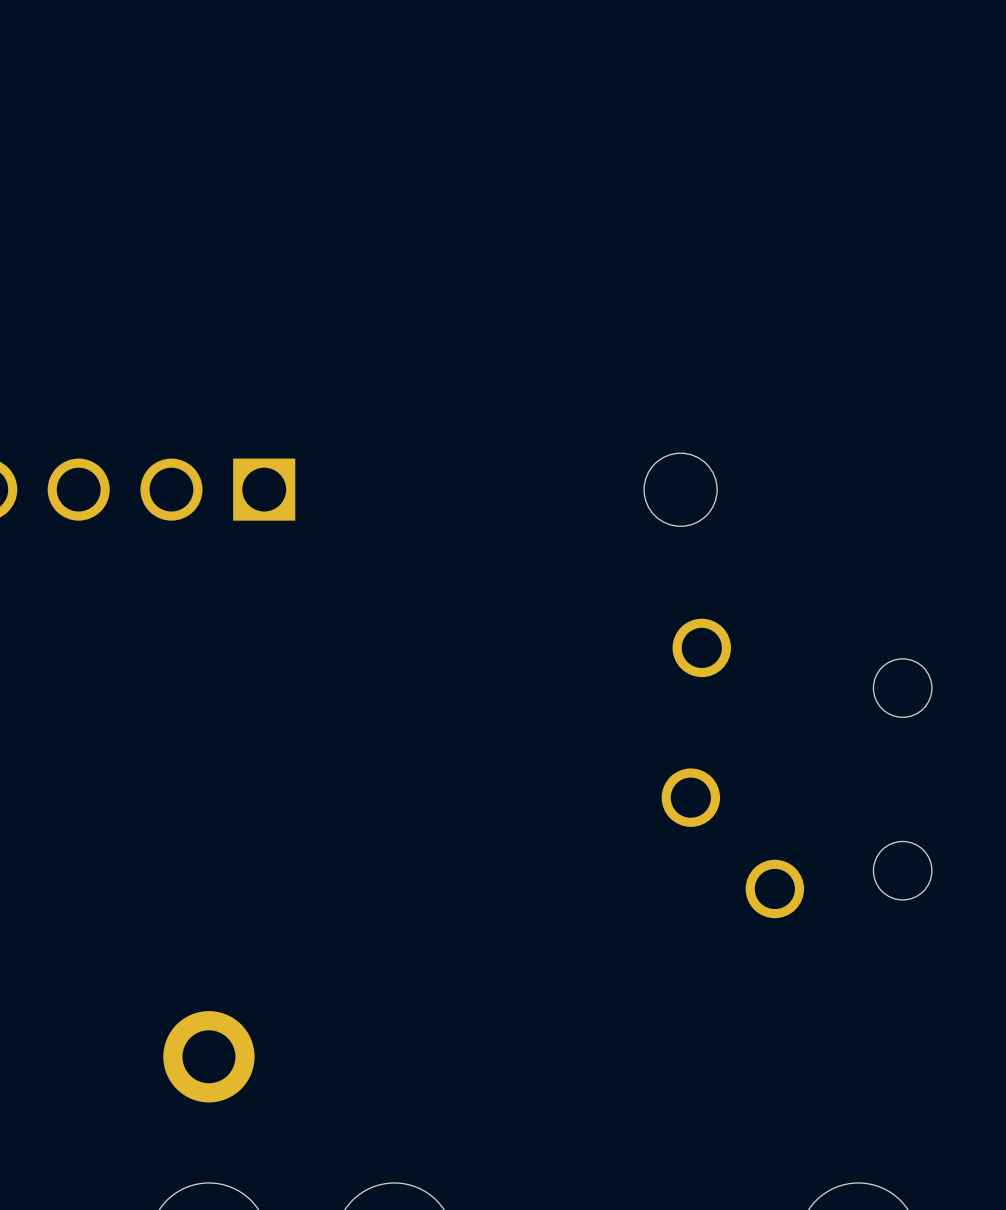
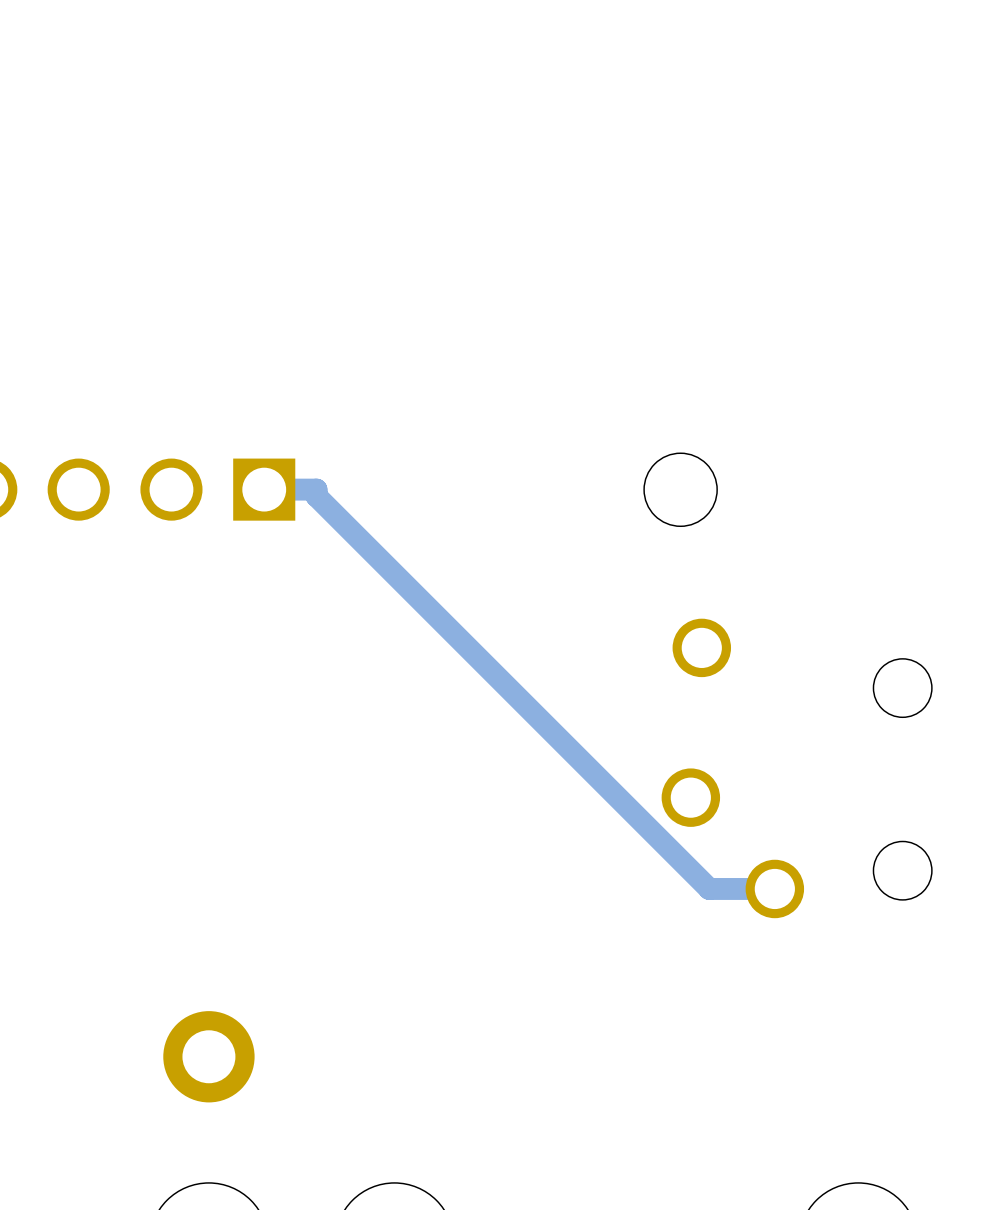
track: none -> (264, 489) (316, 489) (316, 496) (709, 888) (774, 888)

